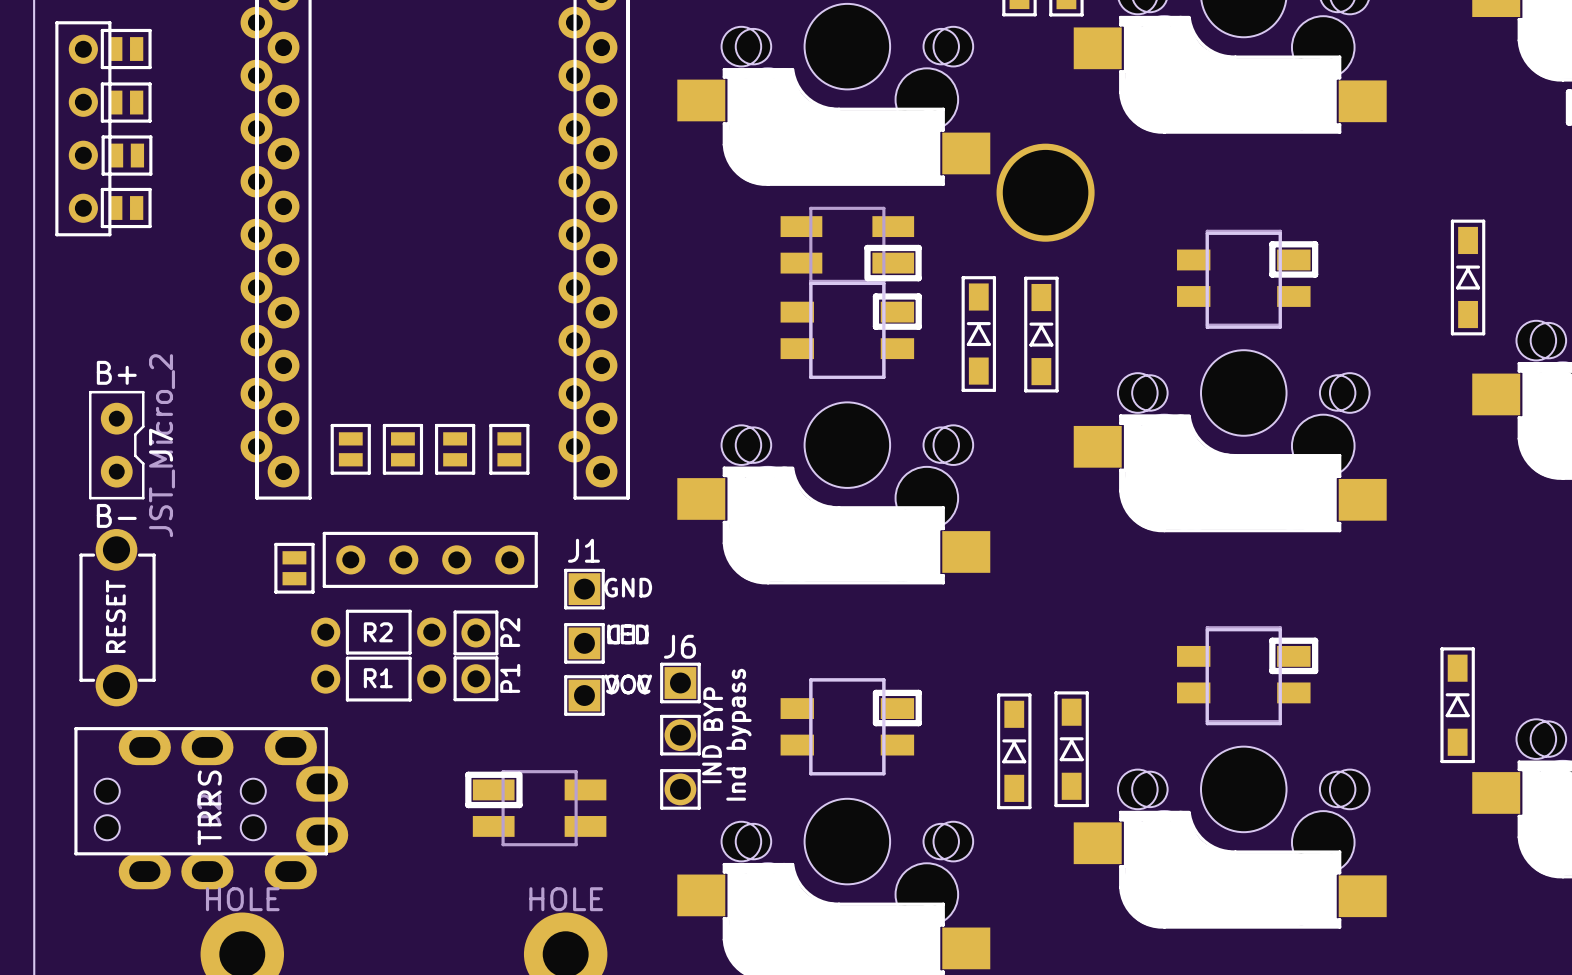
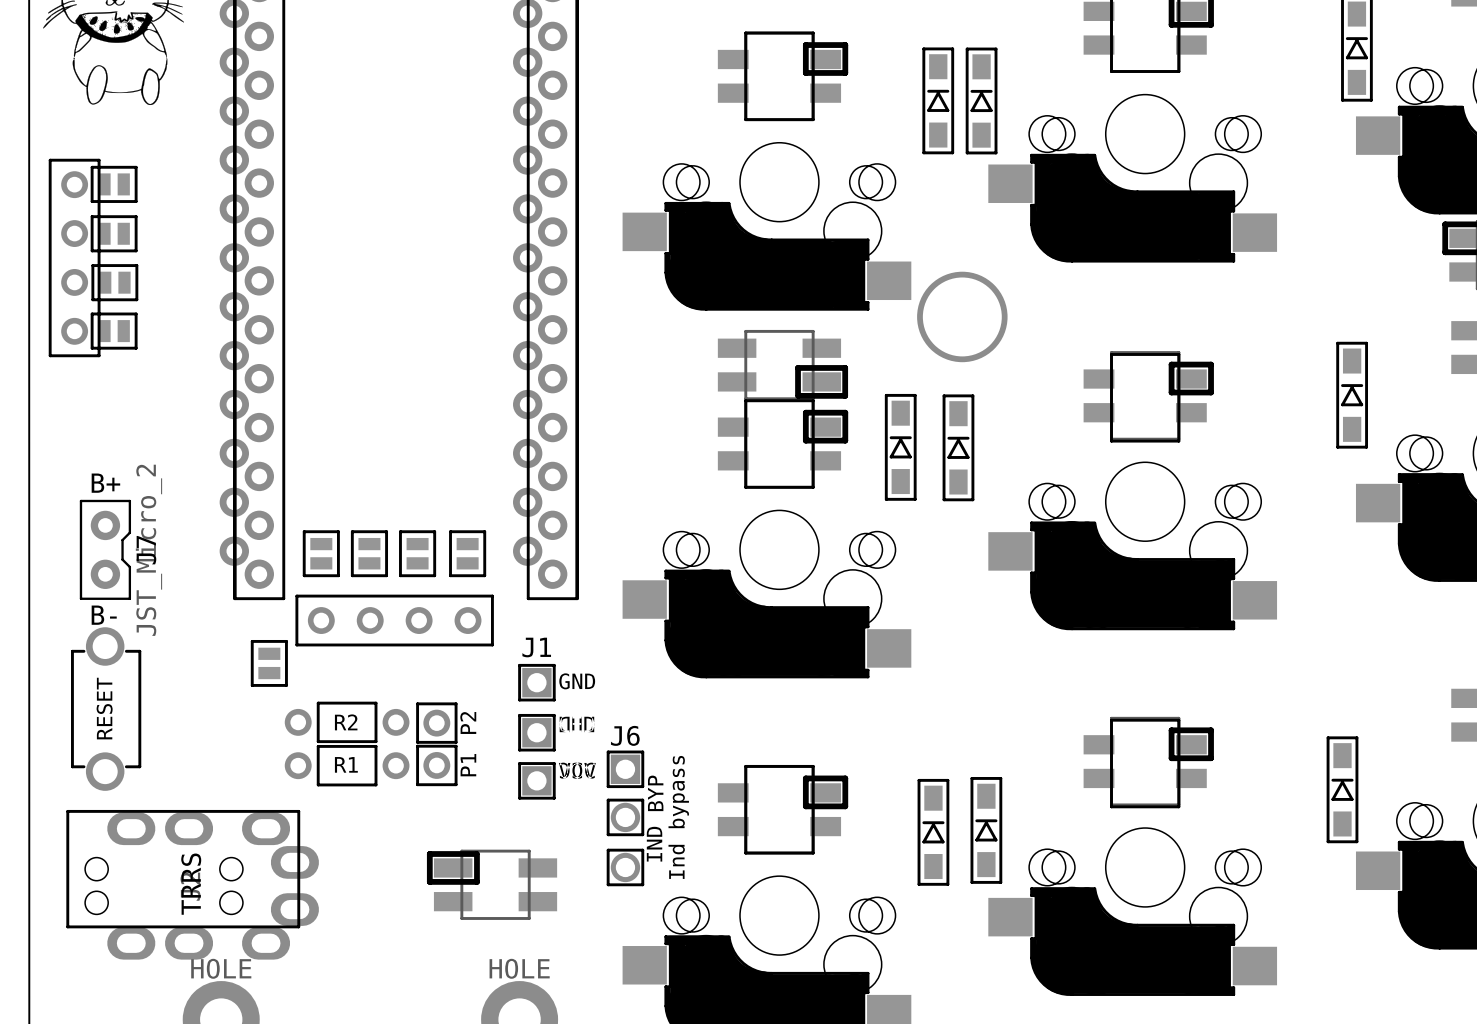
part position: (430, 559) -> (394, 620)

